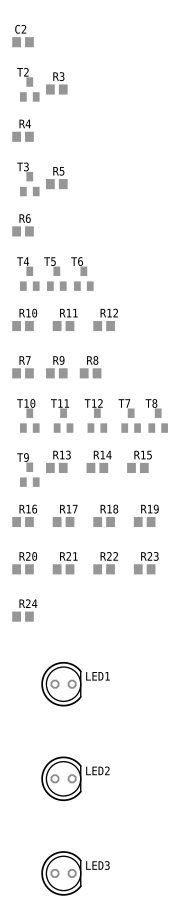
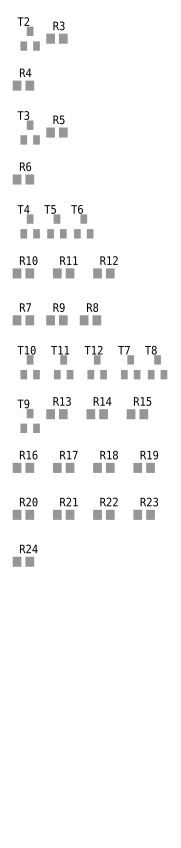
LED1: (61, 684) -> none
LED2: (61, 778) -> none
LED3: (61, 873) -> none

